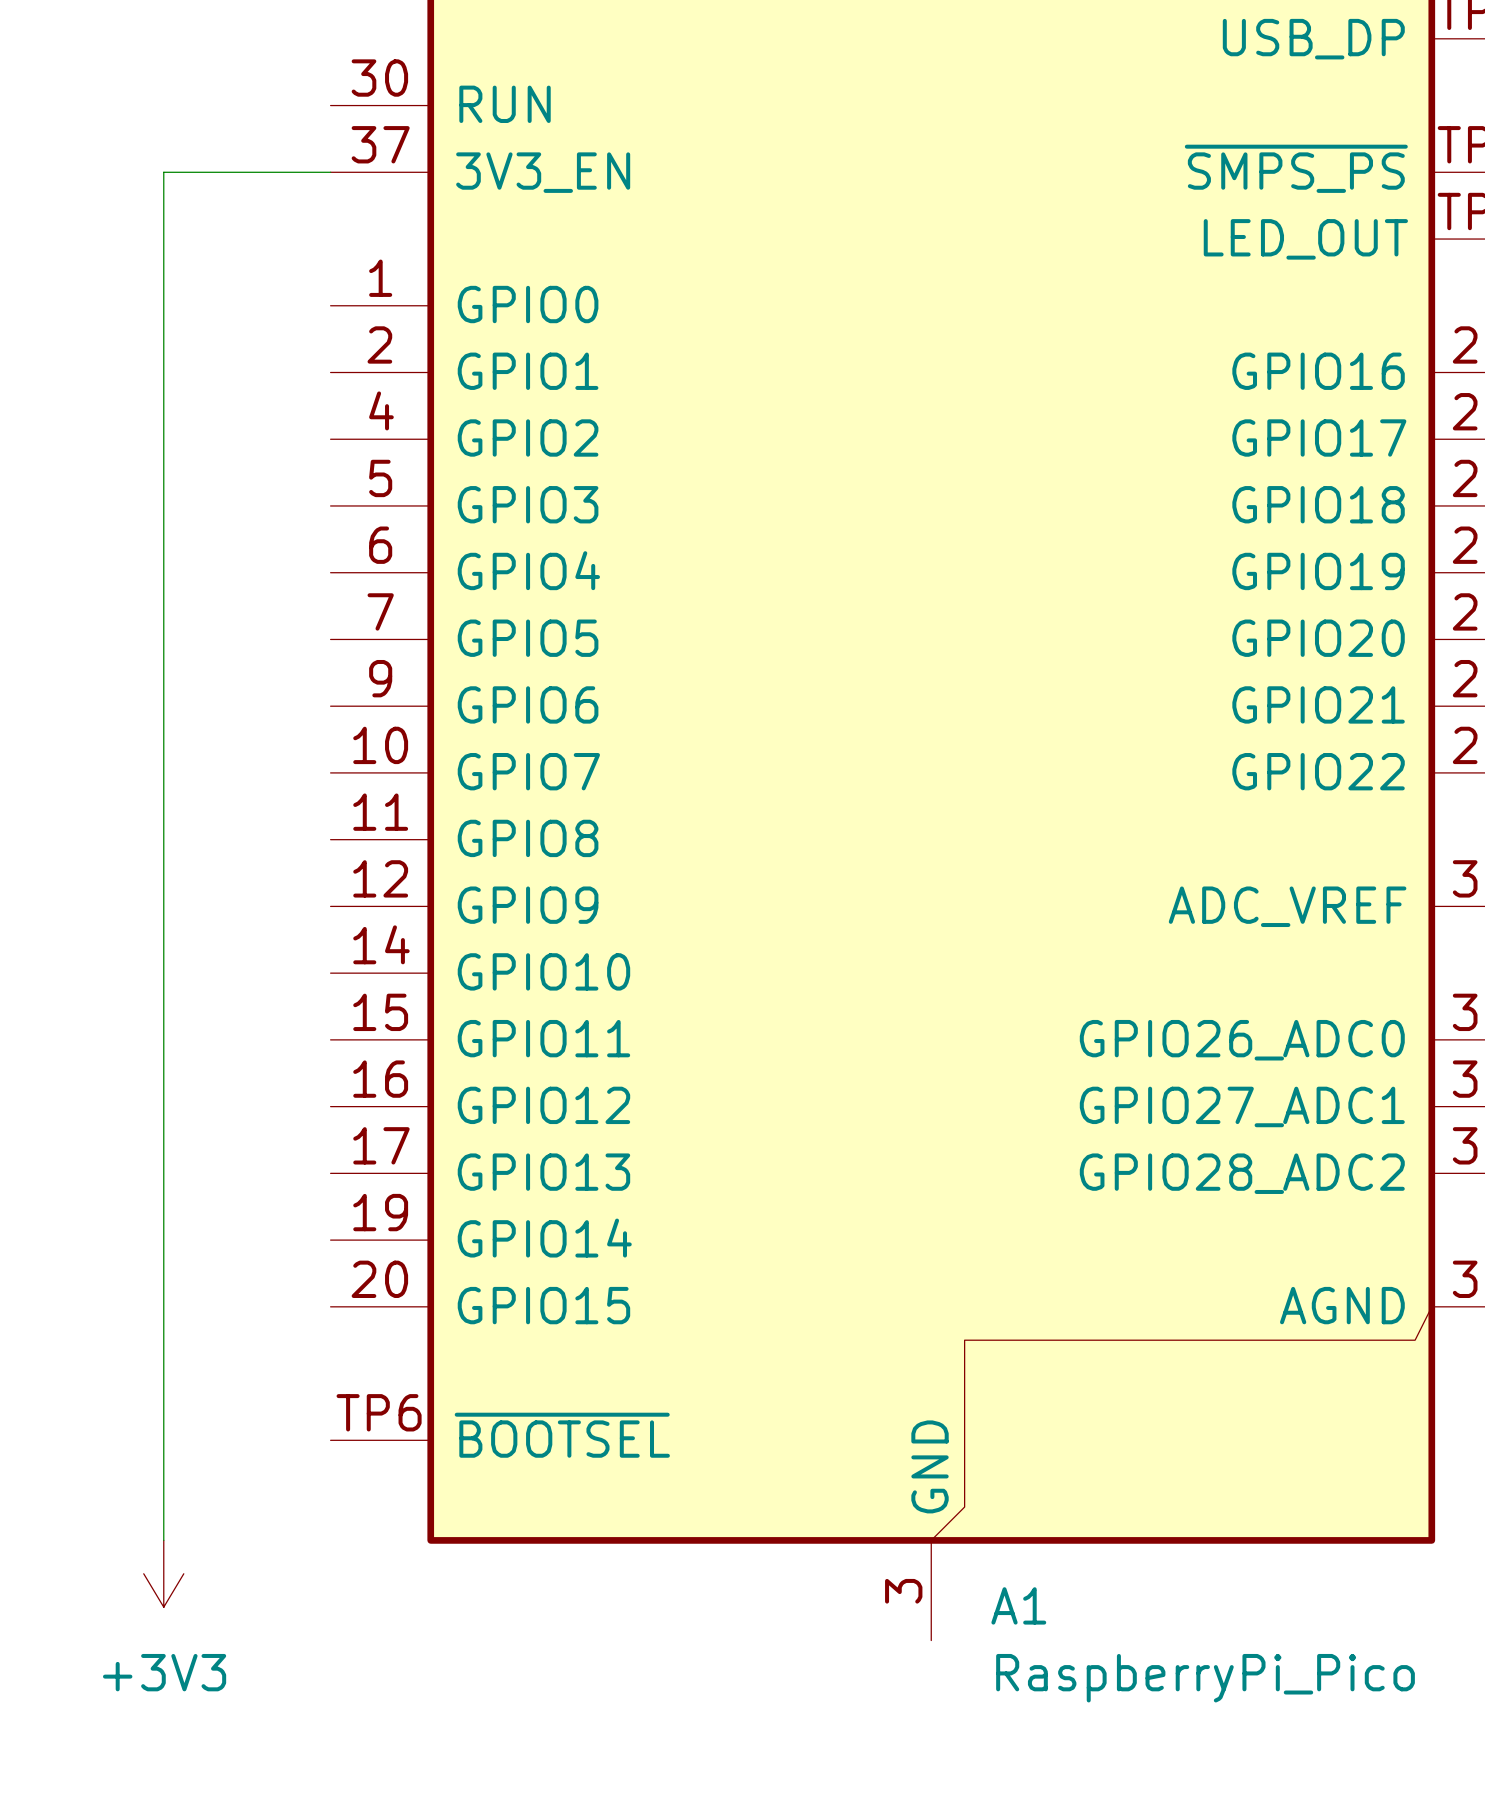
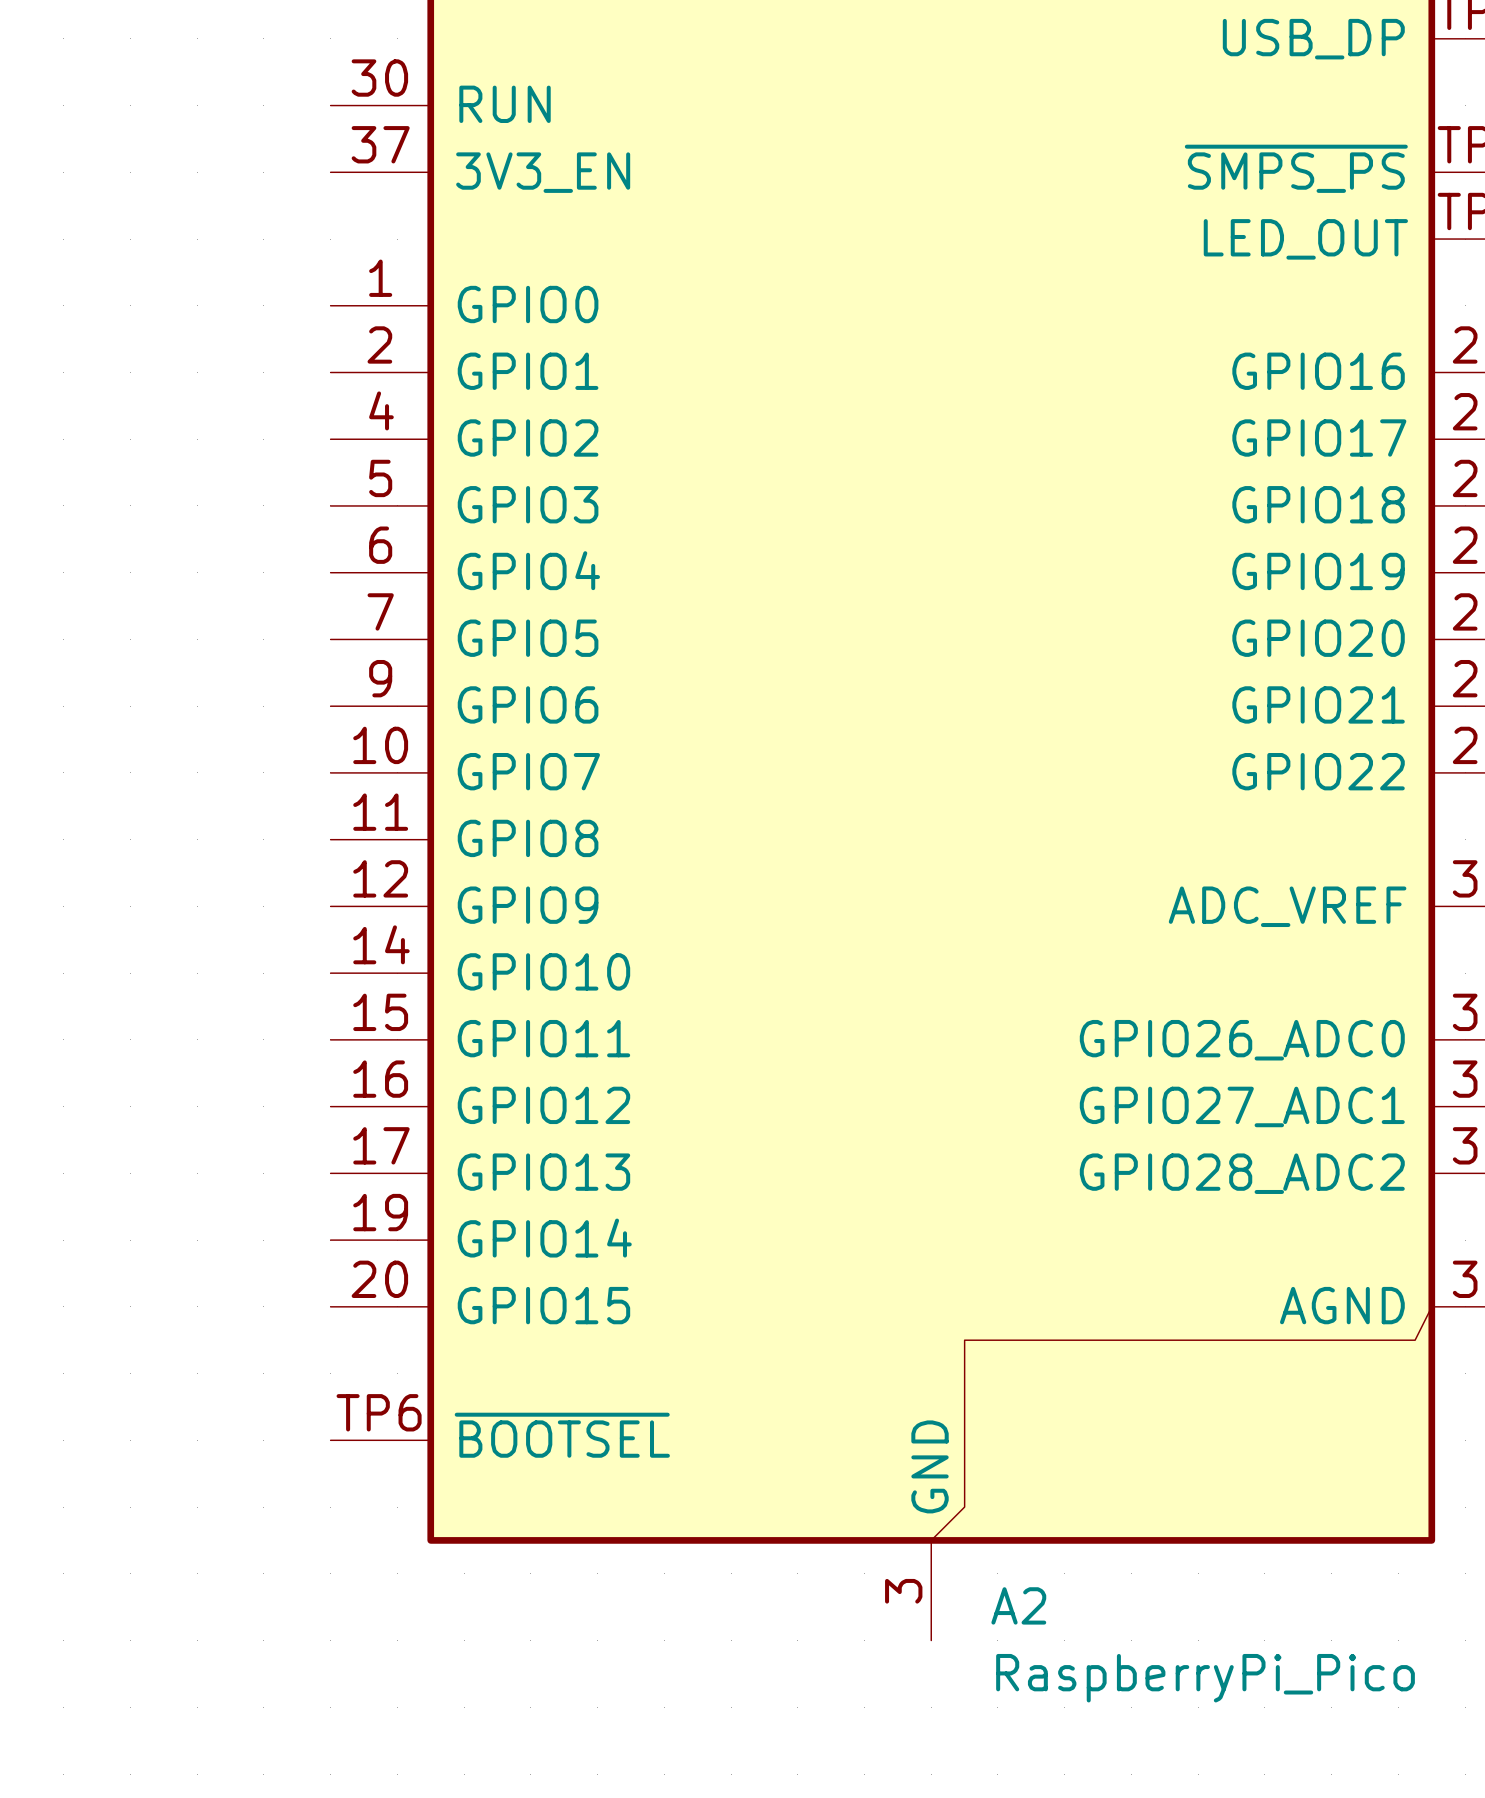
wire: (330, 172) (163, 172) (163, 1540) -> none
power symbol: +3V3 (163, 1573) -> none
A1 name: A1 (1018, 1605) -> A2 (1018, 1605)

